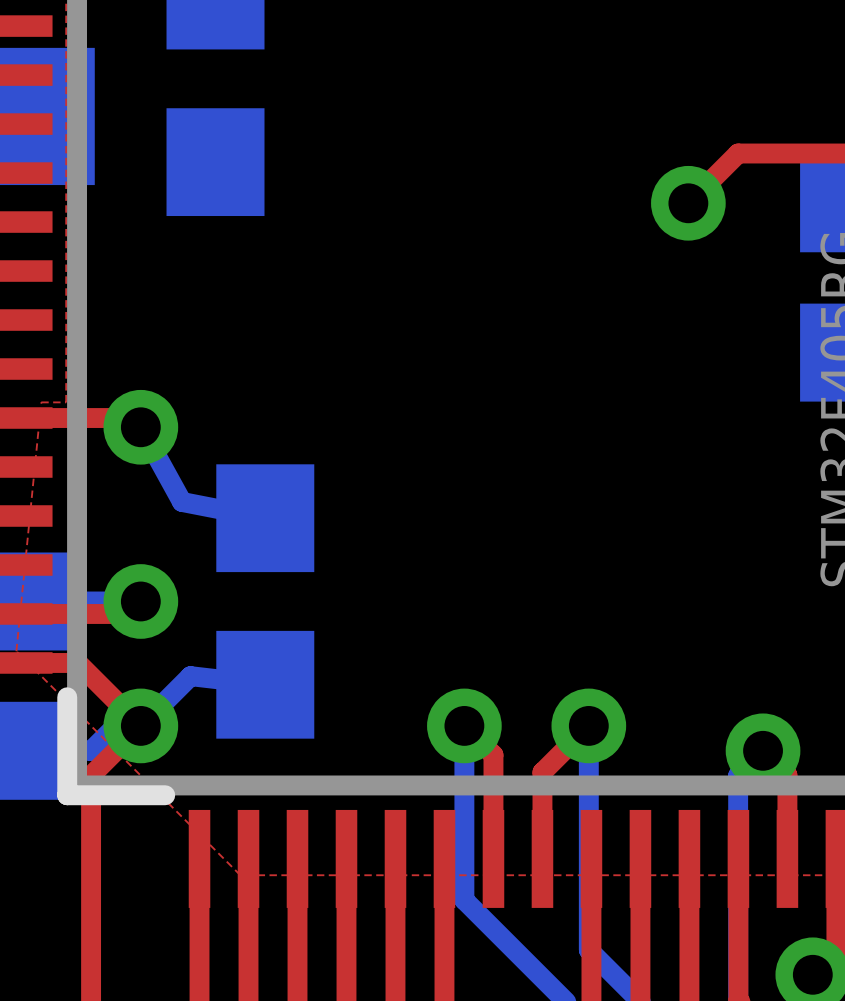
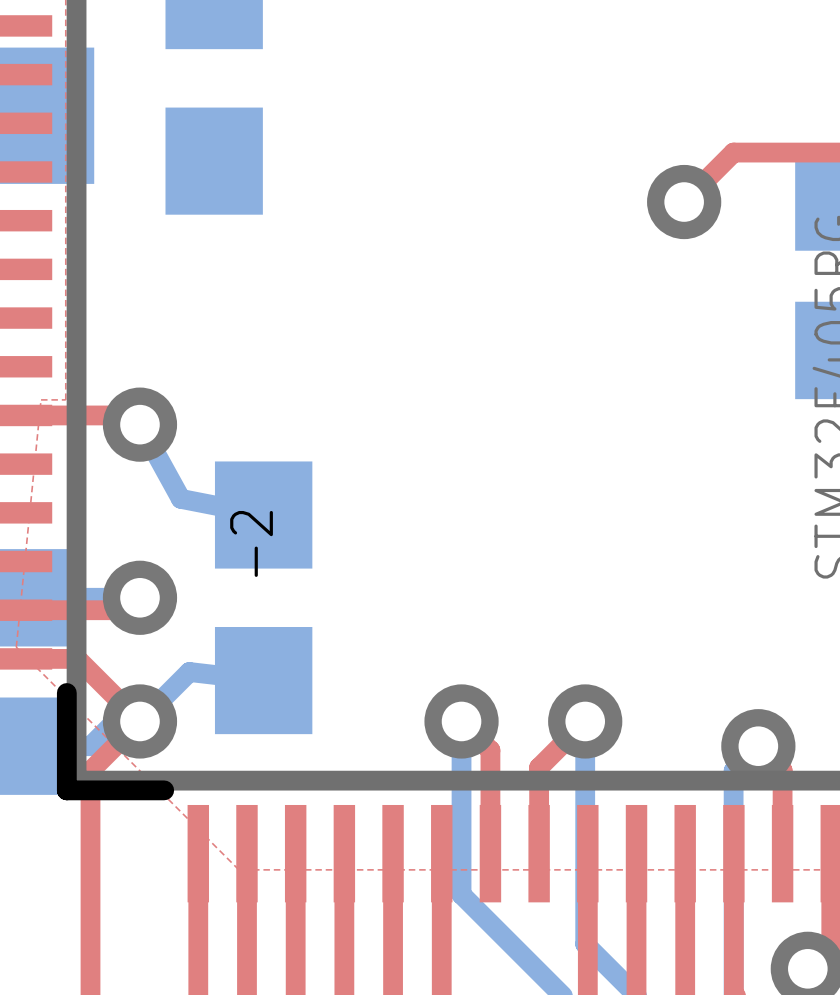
-2 name: none -> -2 (251, 543)

